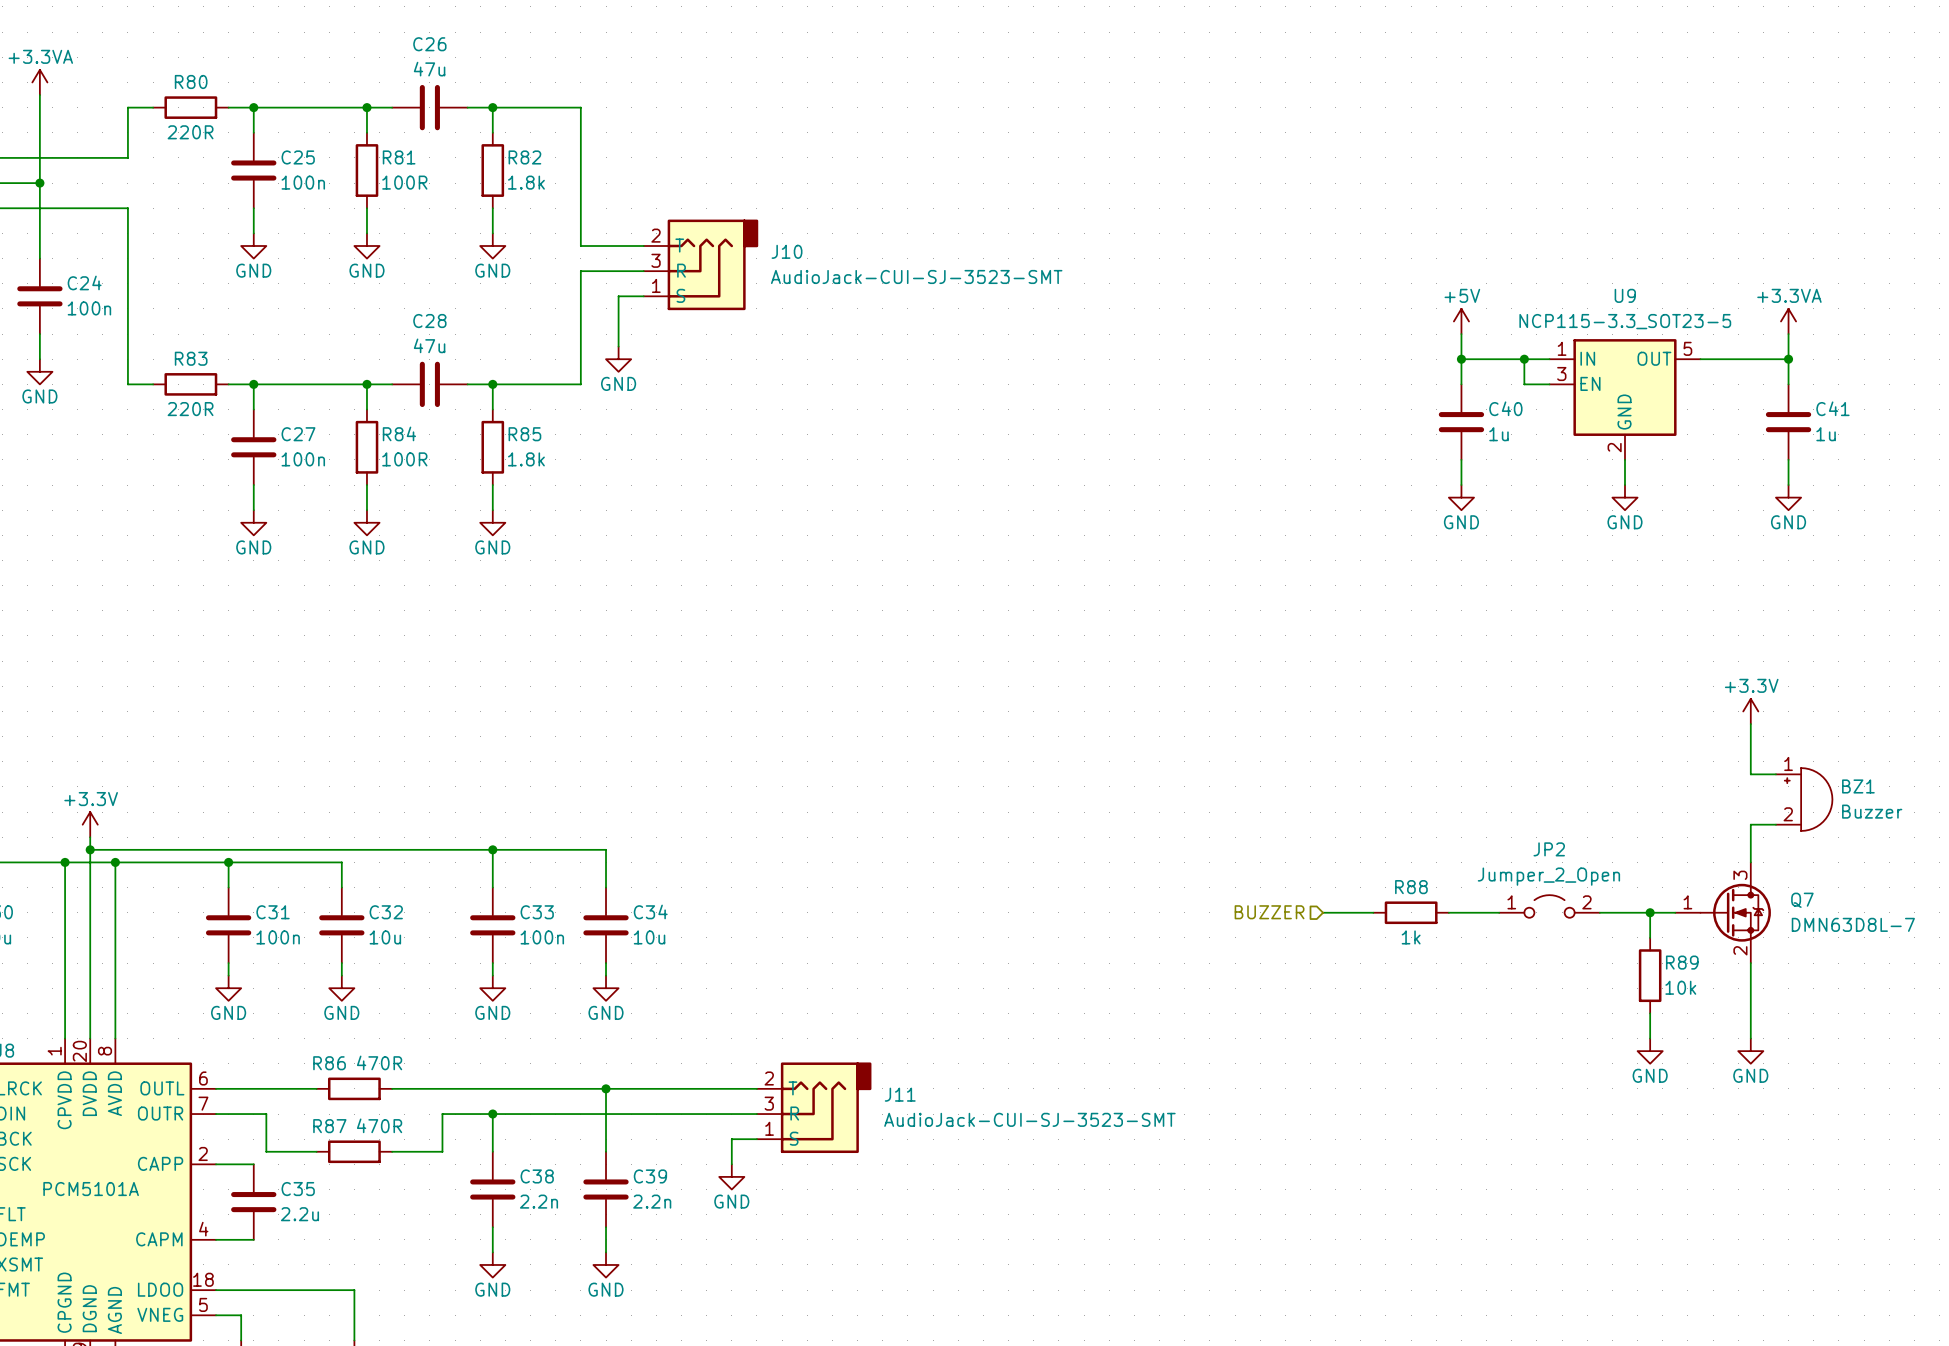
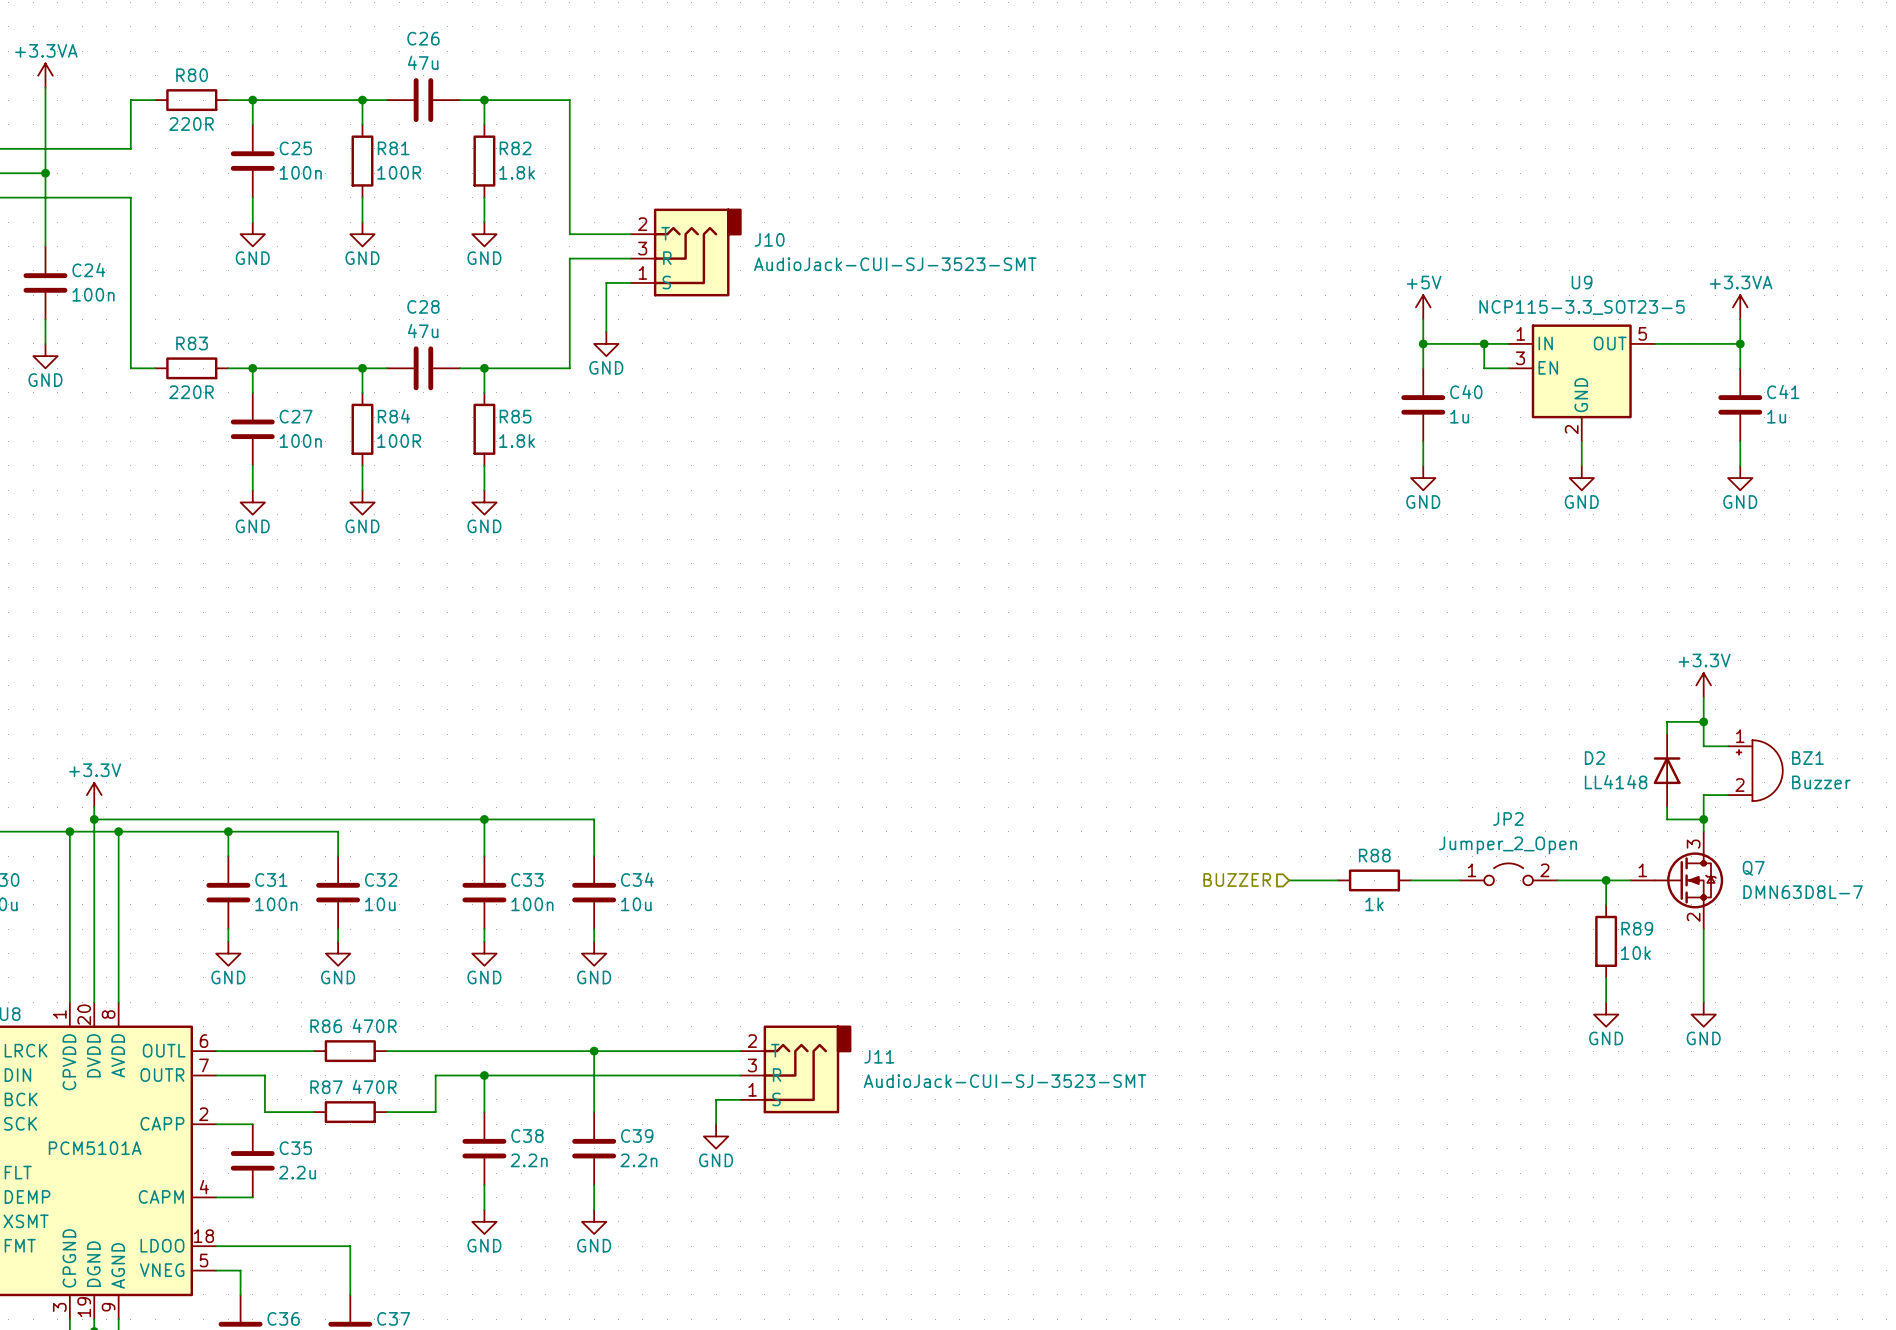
wire: none -> (1703, 721) (1667, 721) (1667, 734)
junction: none -> (1703, 721)
D2: none -> LL4148 (1667, 770)
wire: none -> (1667, 807) (1667, 819) (1703, 819)
junction: none -> (1703, 819)

